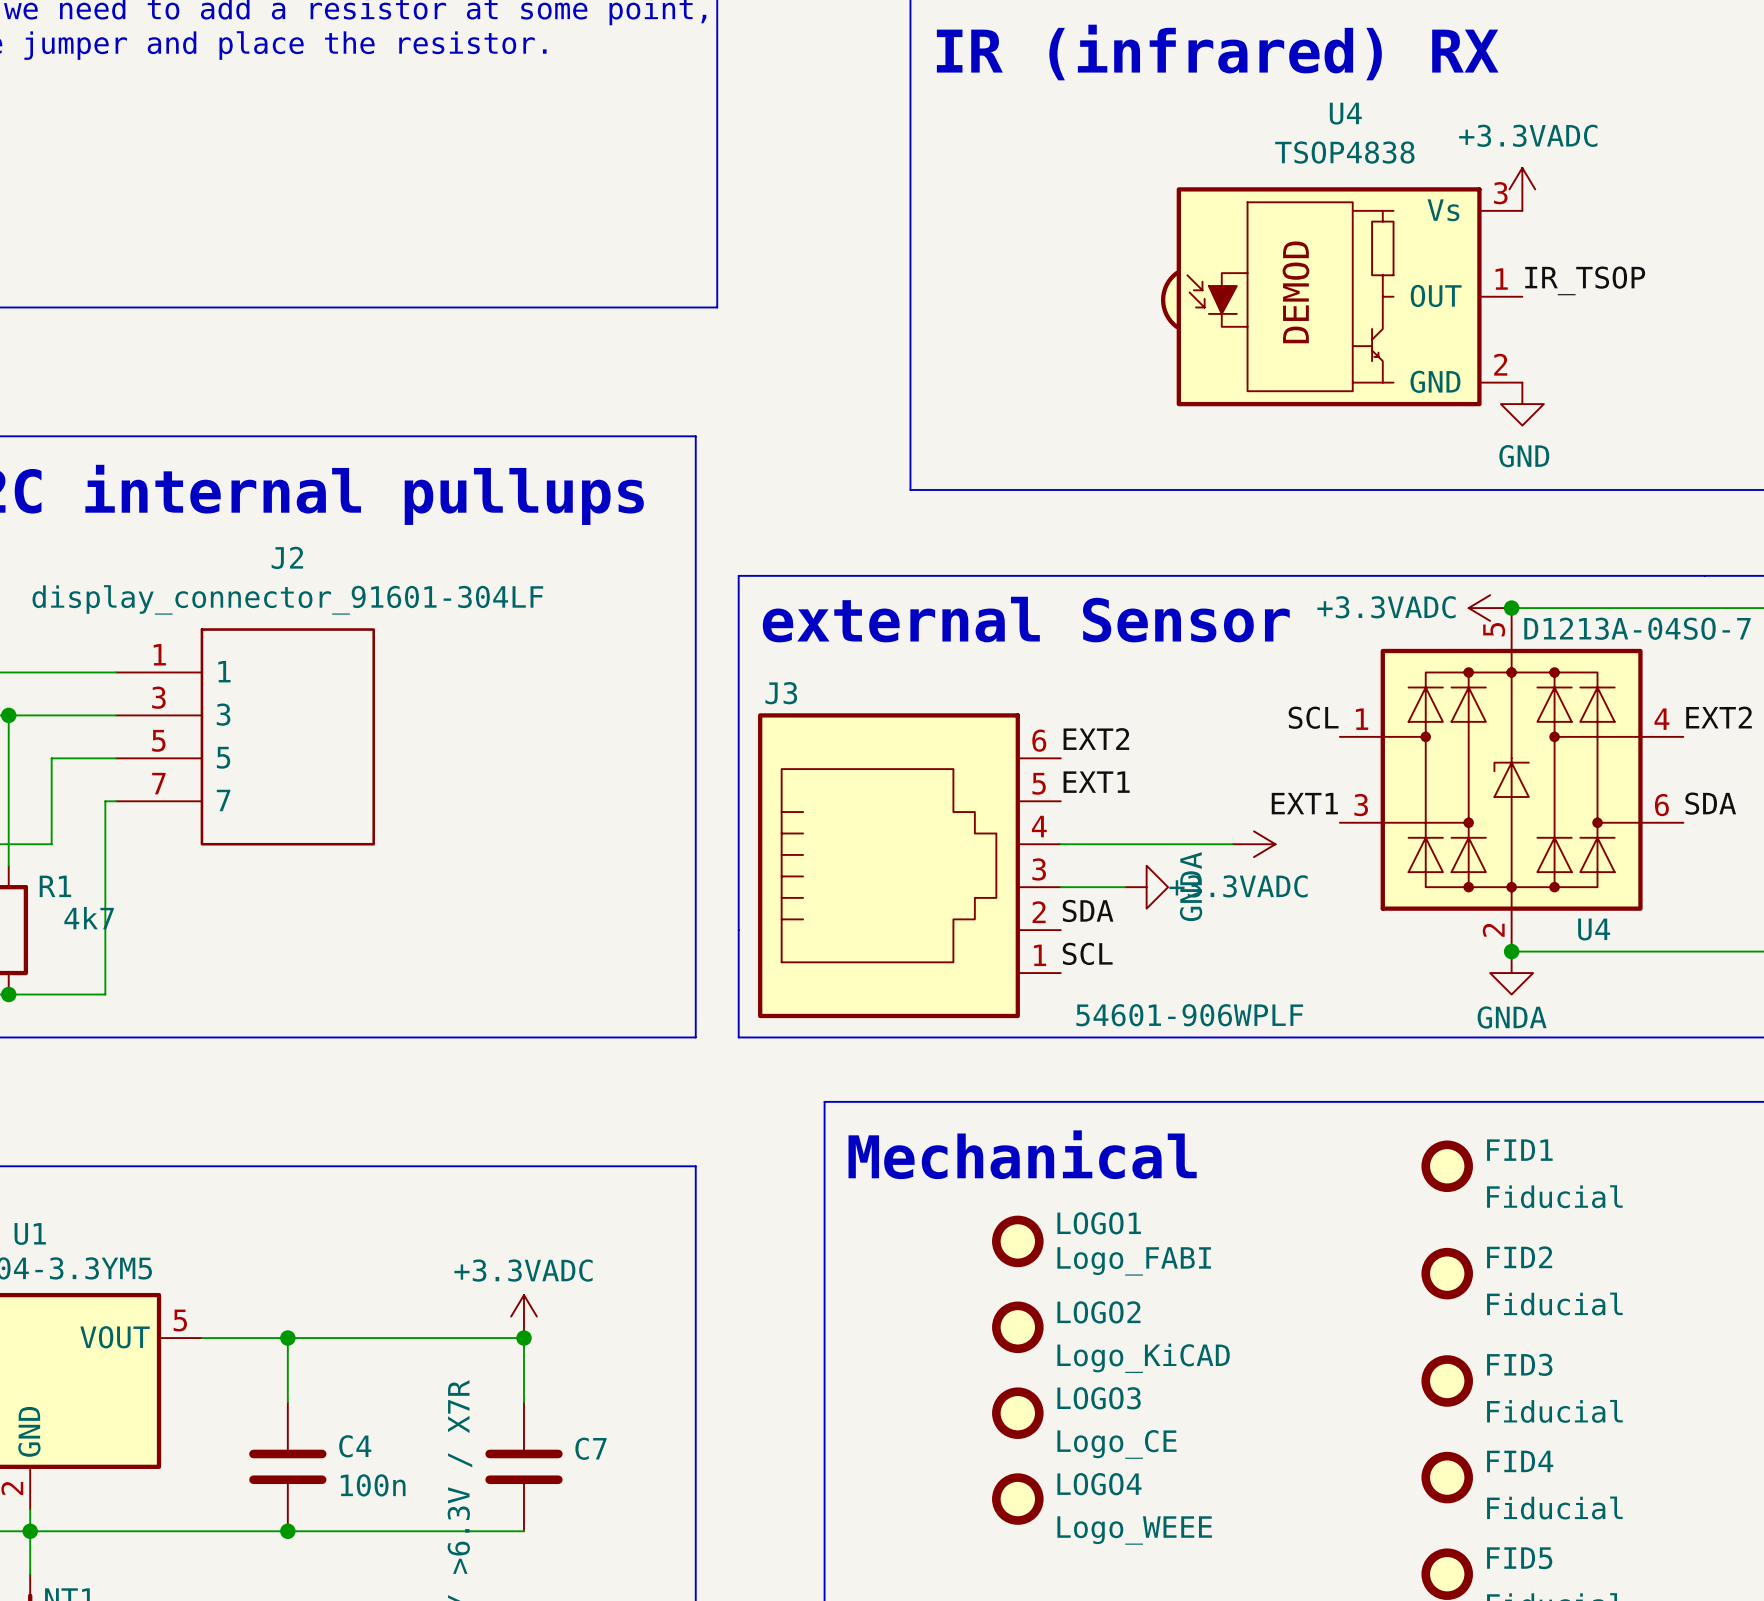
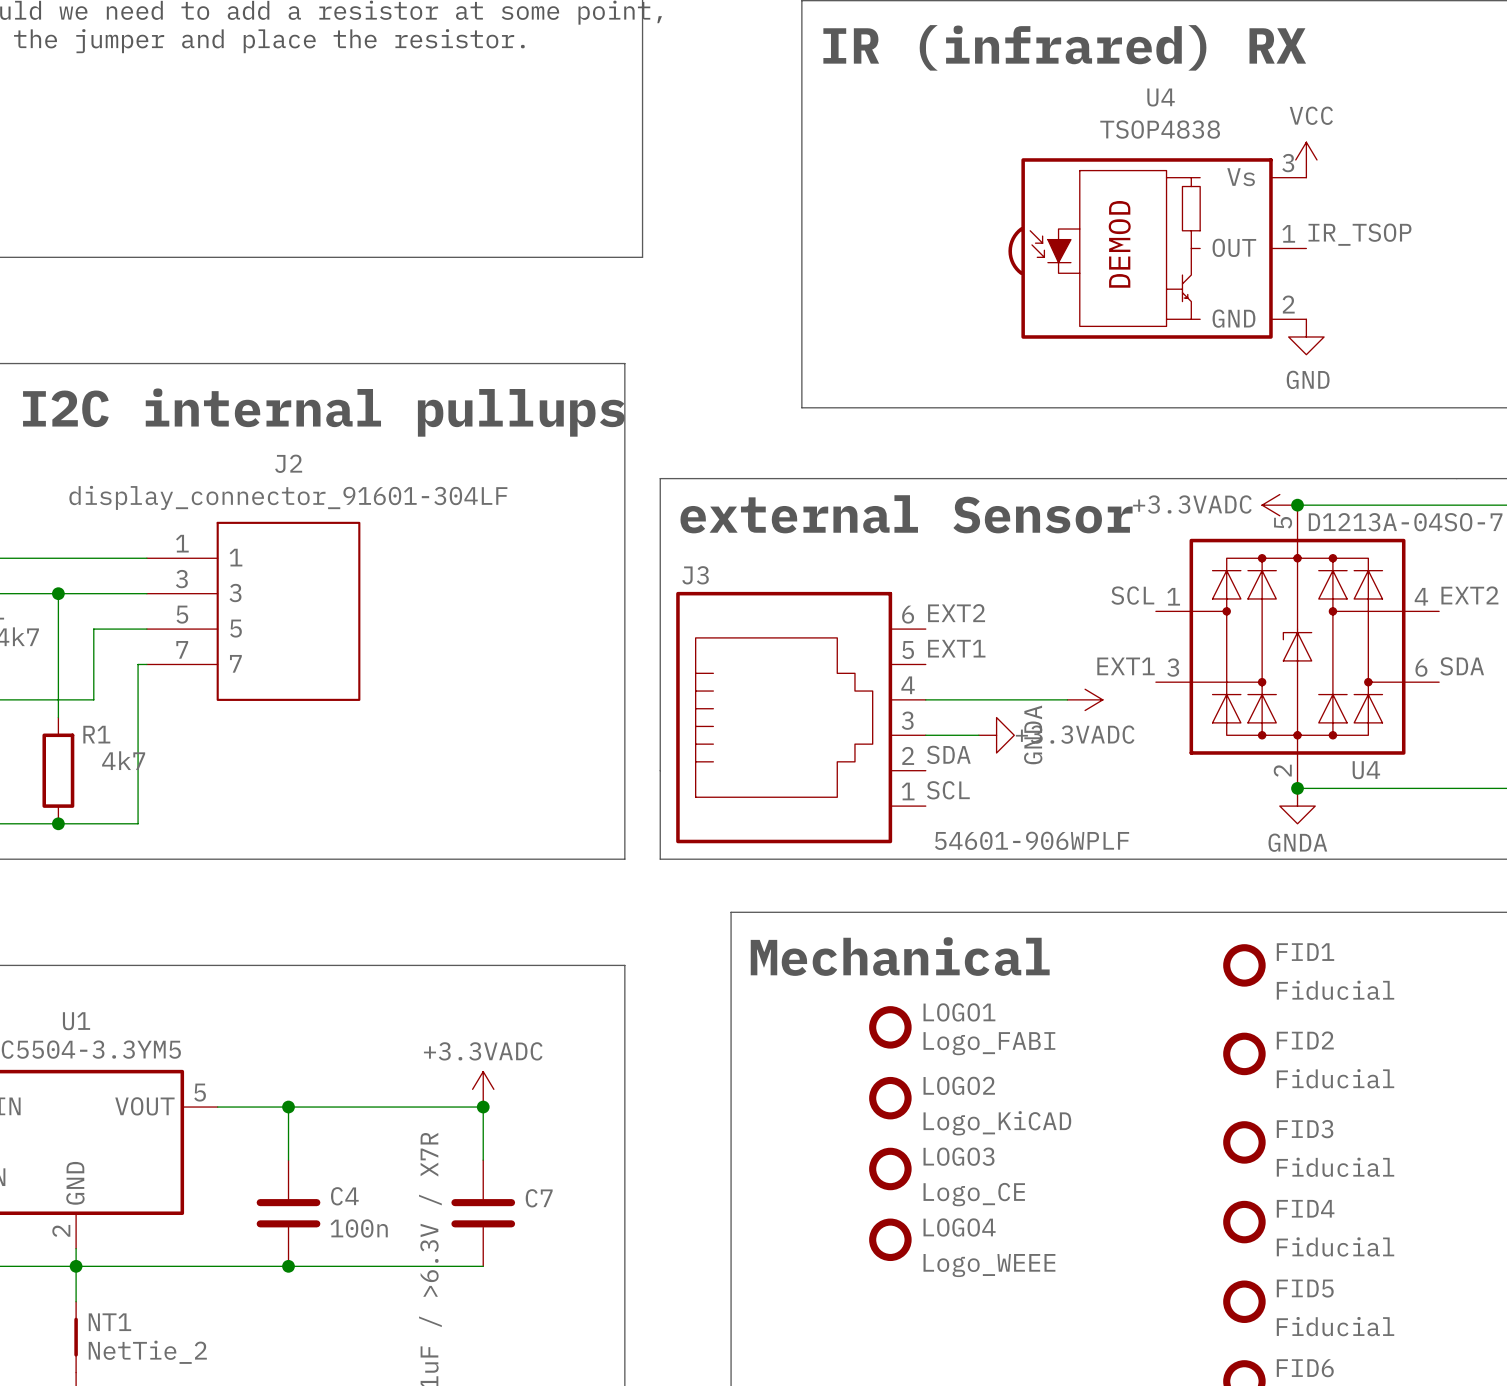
power symbol: +3.3VADC (1522, 189) -> VCC (1306, 159)

